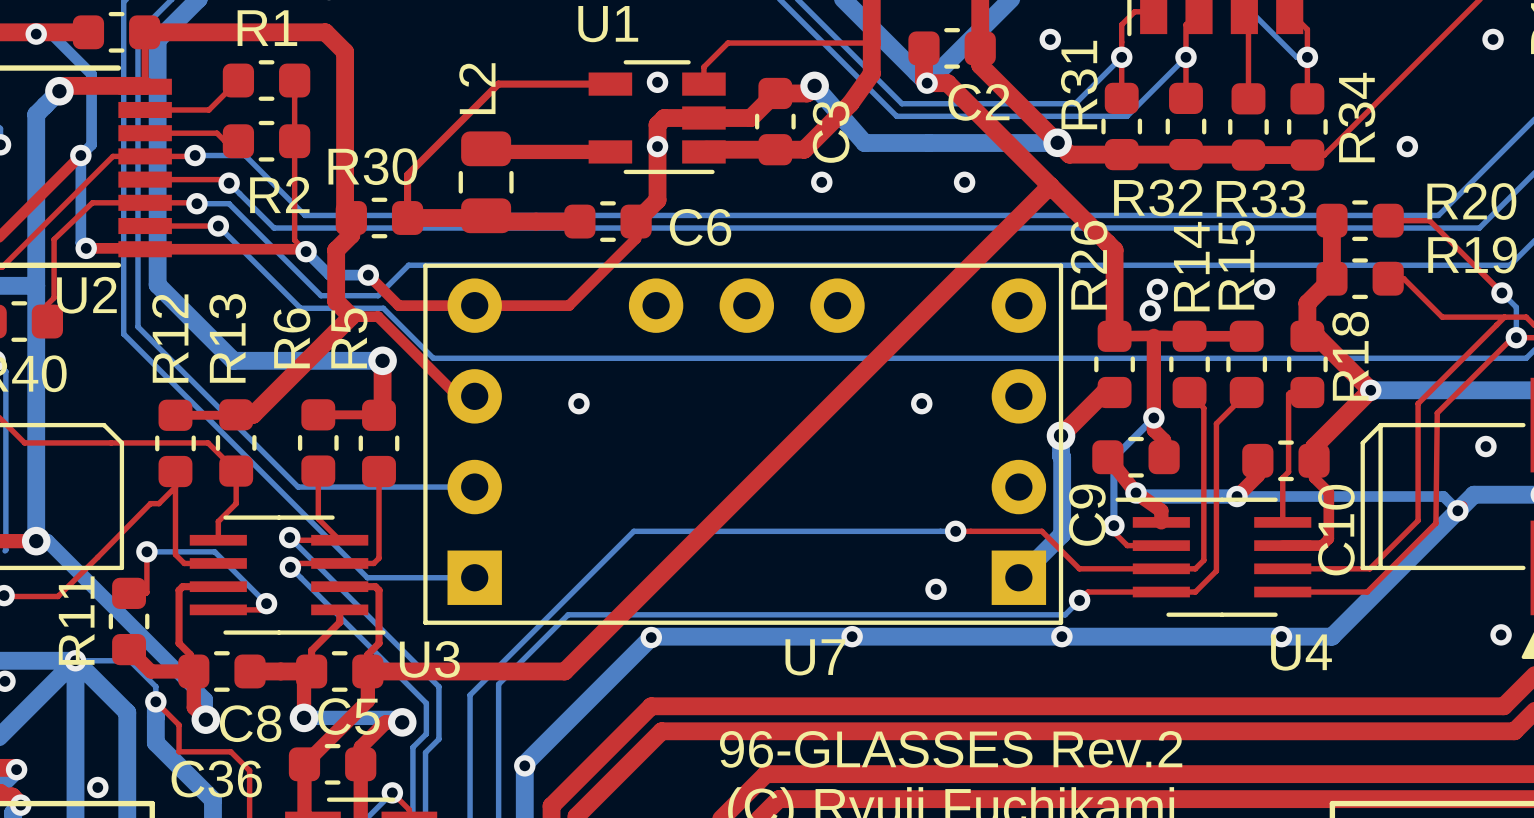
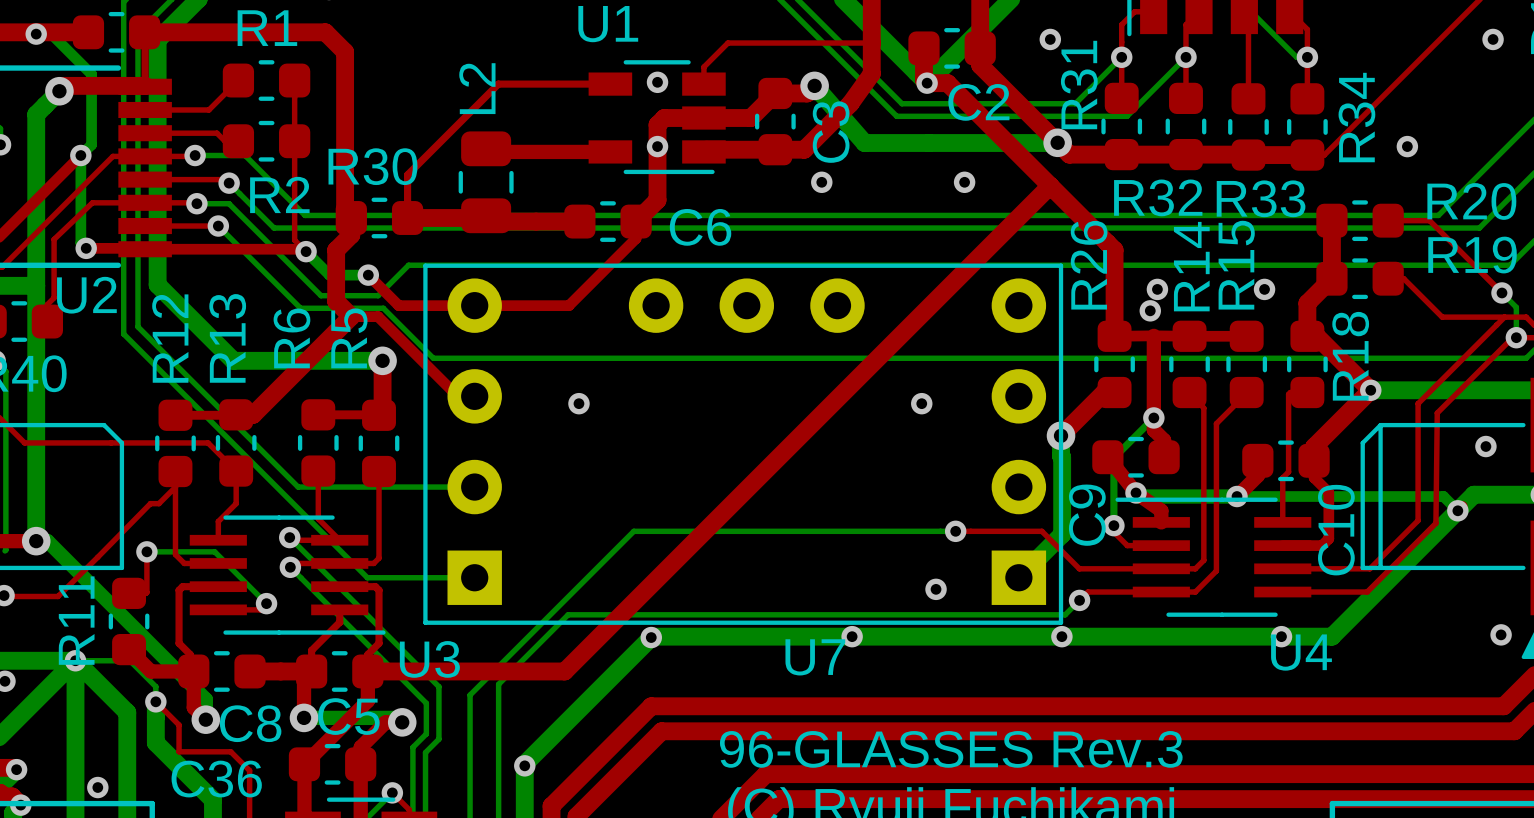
text: 96-GLASSES Rev.2 (951, 749) -> 96-GLASSES Rev.3 (951, 749)

